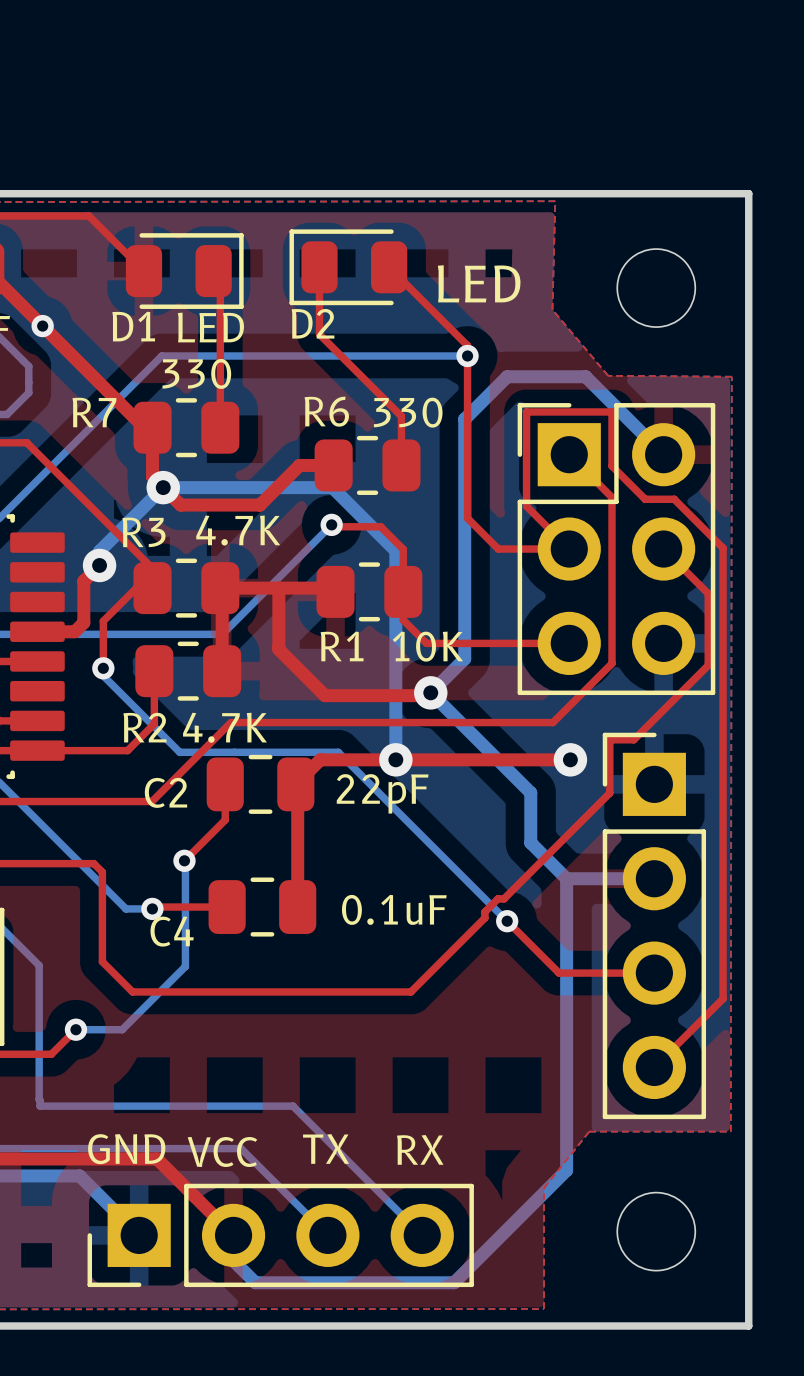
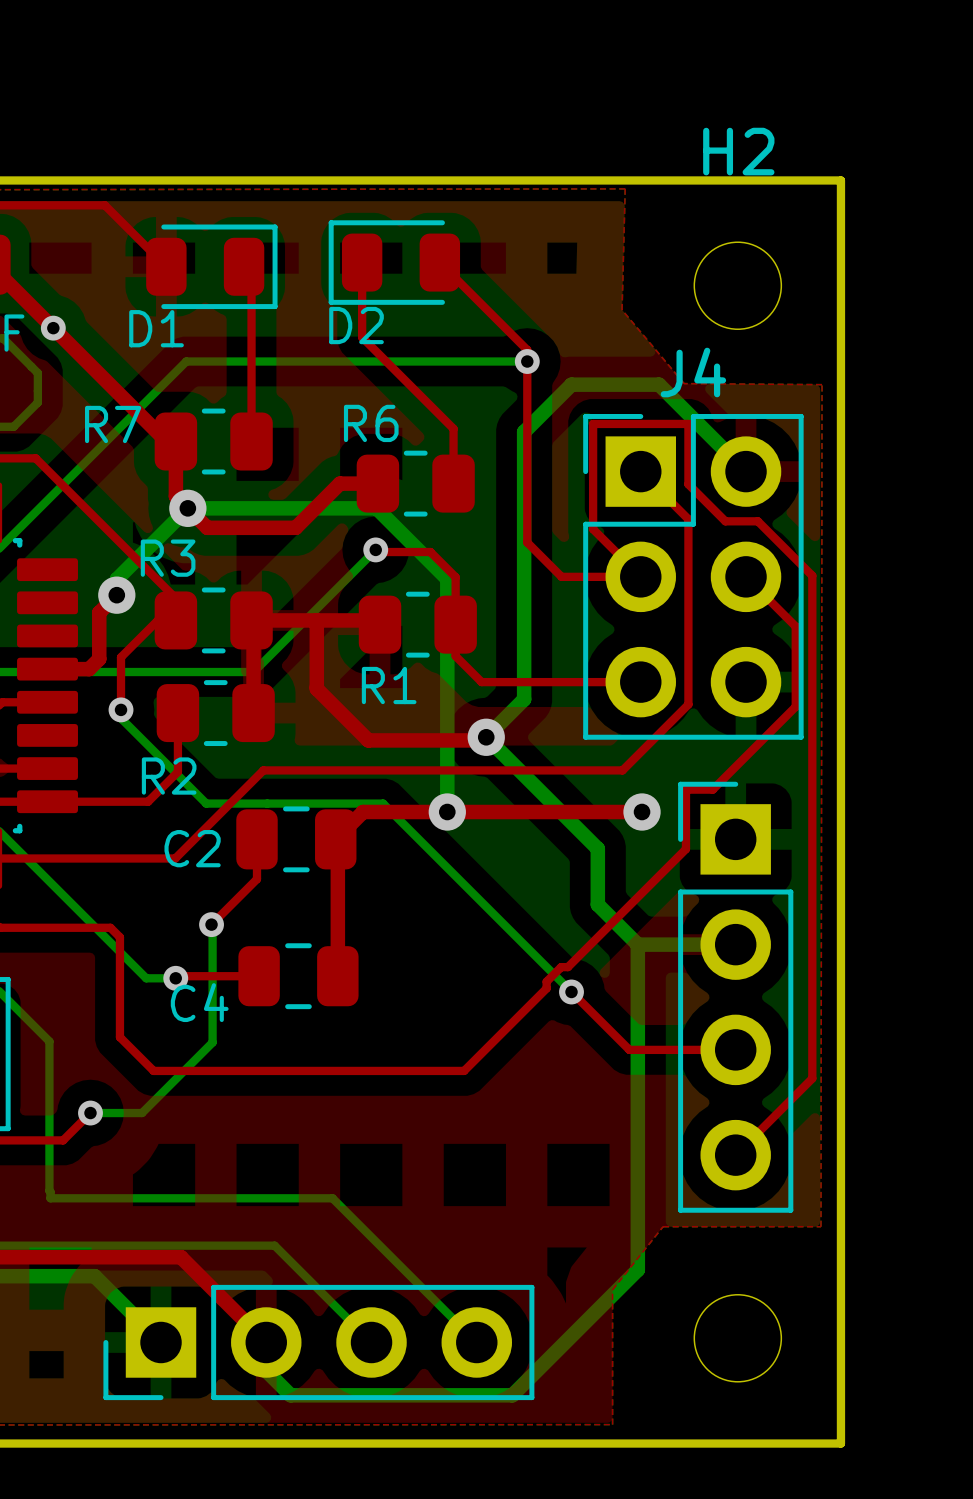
H2 name: none -> H2 (738, 151)
D2 value: LED (479, 283) -> none
D1 value: LED (210, 327) -> none
J4 name: none -> J4 (693, 372)
R7 value: 330 (196, 373) -> none
R6 value: 330 (408, 412) -> none
R3 value: 4.7K (238, 530) -> none
R1 value: 10K (427, 646) -> none
R2 value: 4.7K (224, 727) -> none
C2 value: 22pF (382, 793) -> none
C4 value: 0.1uF (394, 909) -> none
text: TX (326, 1148) -> none
text: GND (126, 1149) -> none
text: RX (420, 1149) -> none
text: VCC (222, 1152) -> none

